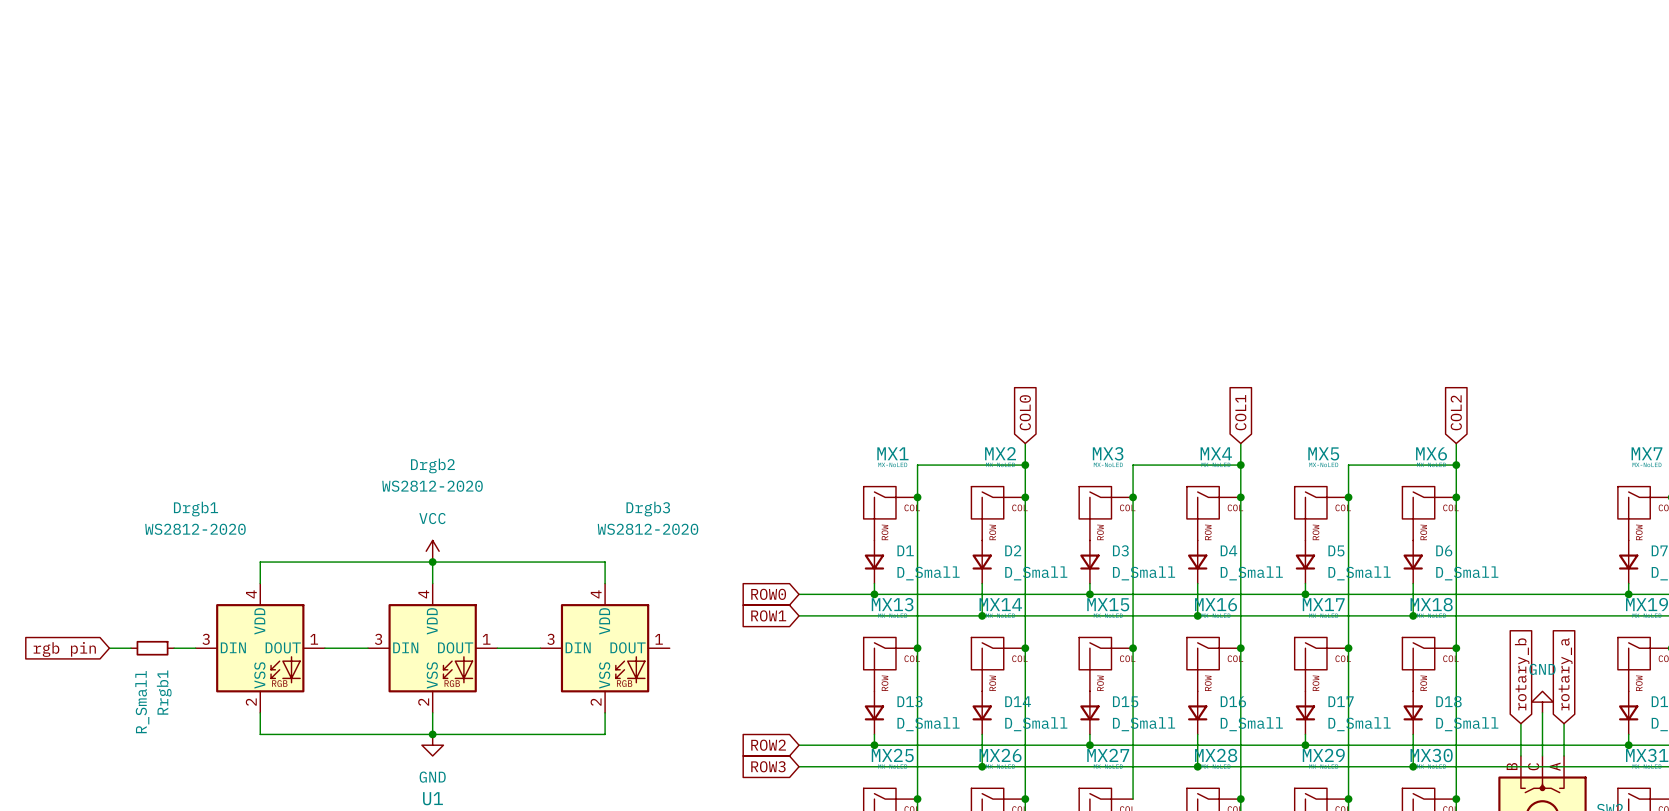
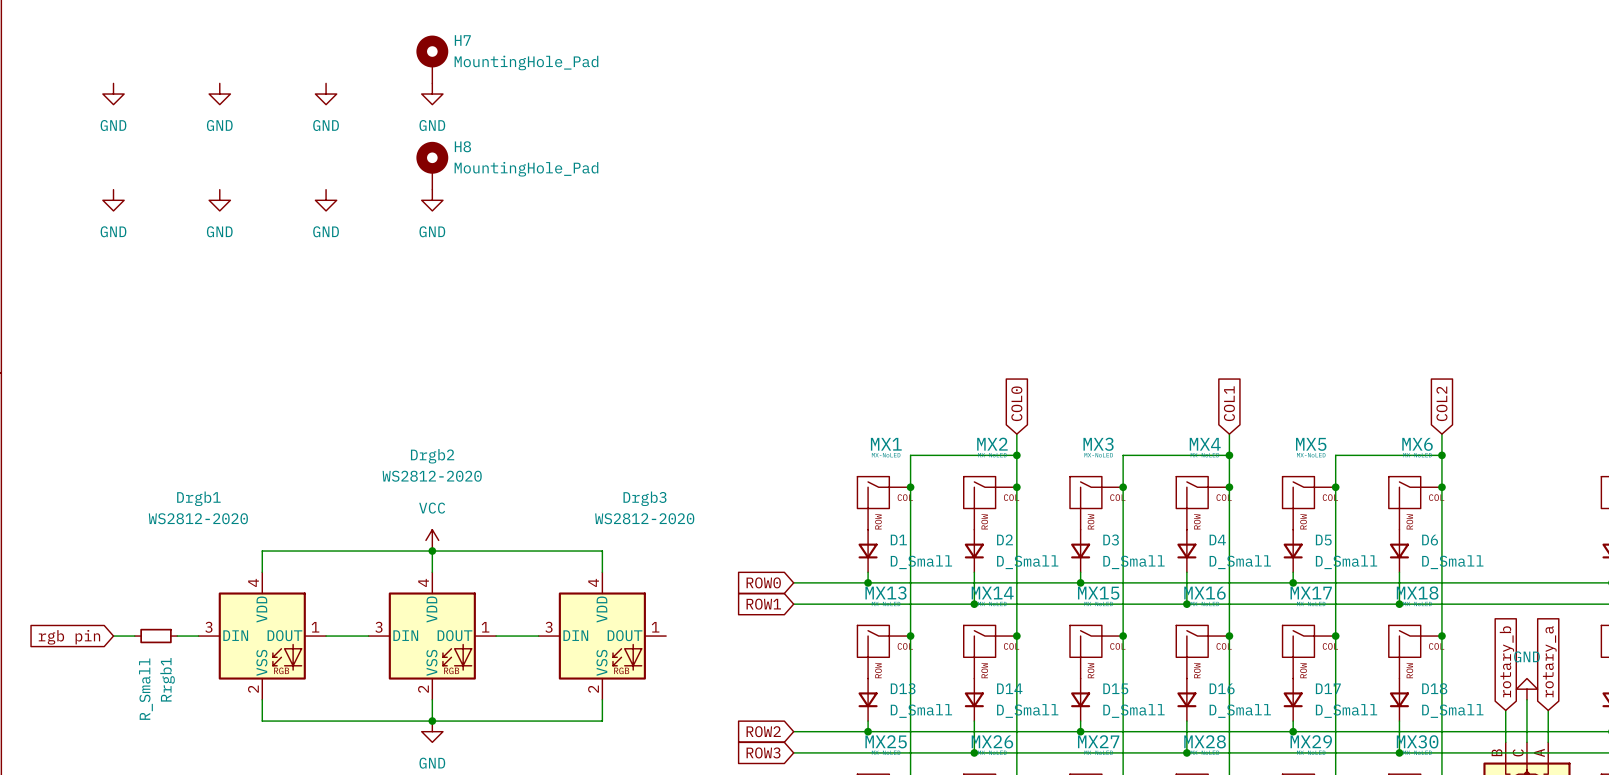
H7: none -> MountingHole_Pad (432, 59)
power symbol: none -> GND (113, 94)
power symbol: none -> GND (219, 94)
power symbol: none -> GND (326, 94)
power symbol: none -> GND (432, 94)
H8: none -> MountingHole_Pad (432, 165)
power symbol: none -> GND (113, 200)
power symbol: none -> GND (219, 200)
power symbol: none -> GND (326, 200)
power symbol: none -> GND (432, 200)

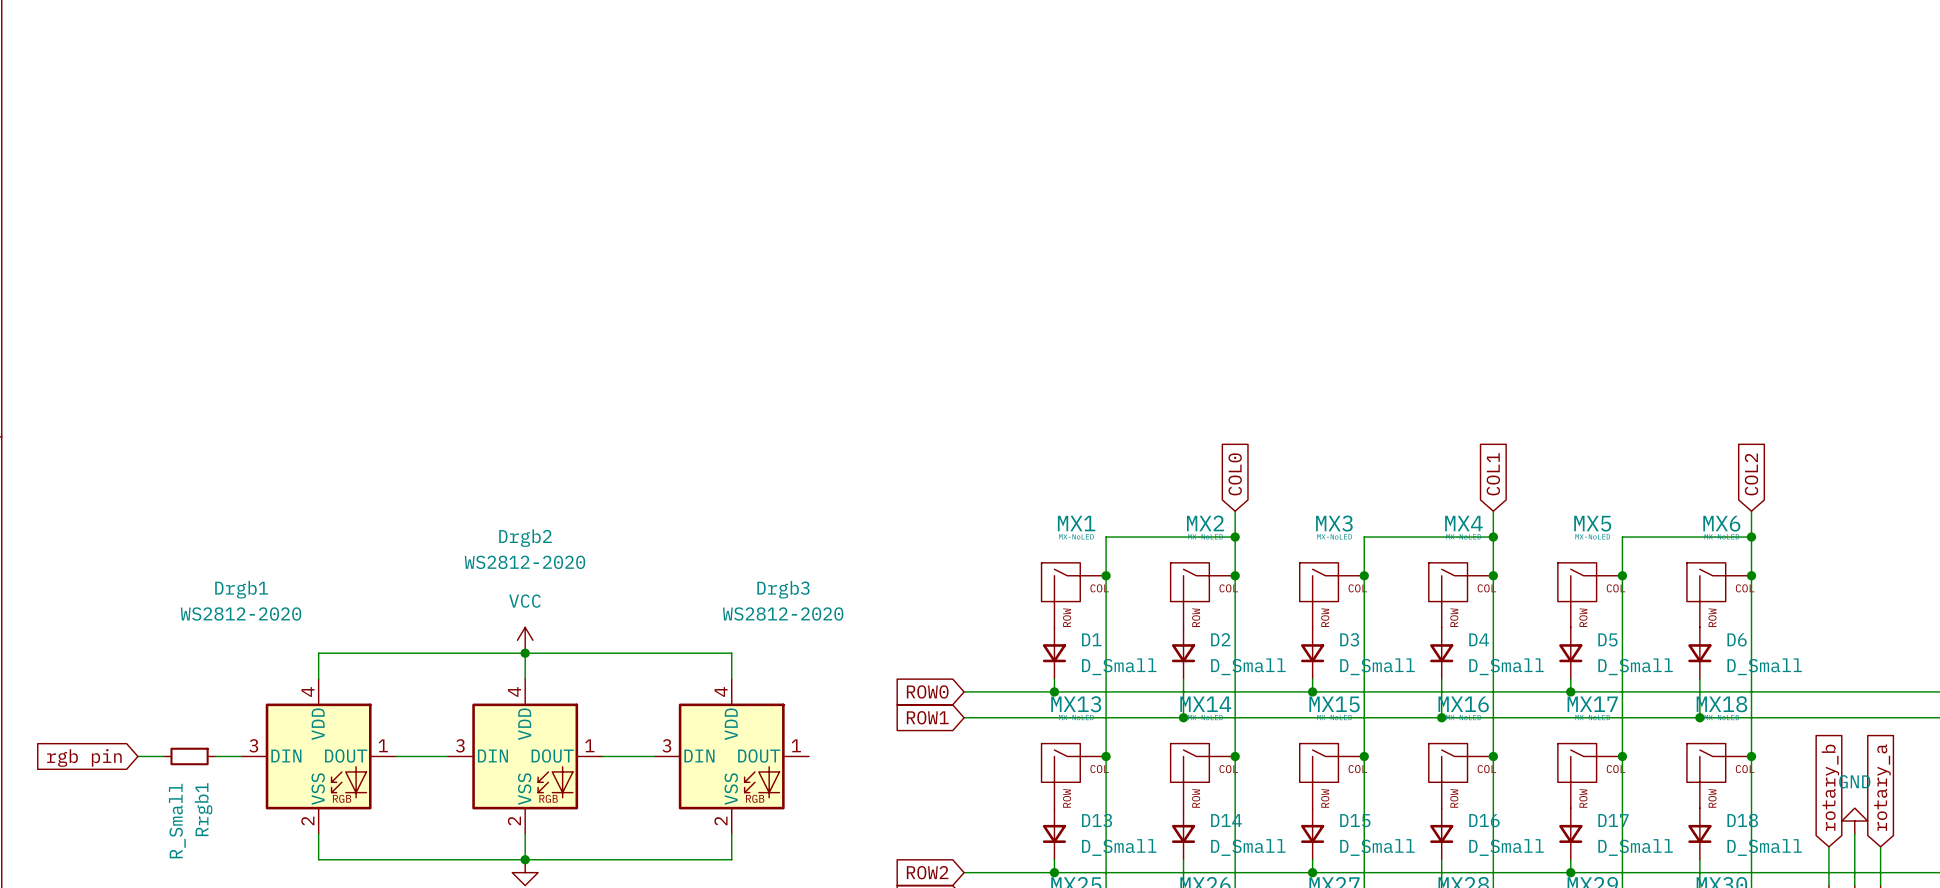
H7: MountingHole_Pad (432, 59) -> none
power symbol: GND (113, 94) -> none
power symbol: GND (219, 94) -> none
power symbol: GND (326, 94) -> none
power symbol: GND (432, 94) -> none
H8: MountingHole_Pad (432, 165) -> none
power symbol: GND (113, 200) -> none
power symbol: GND (219, 200) -> none
power symbol: GND (326, 200) -> none
power symbol: GND (432, 200) -> none

